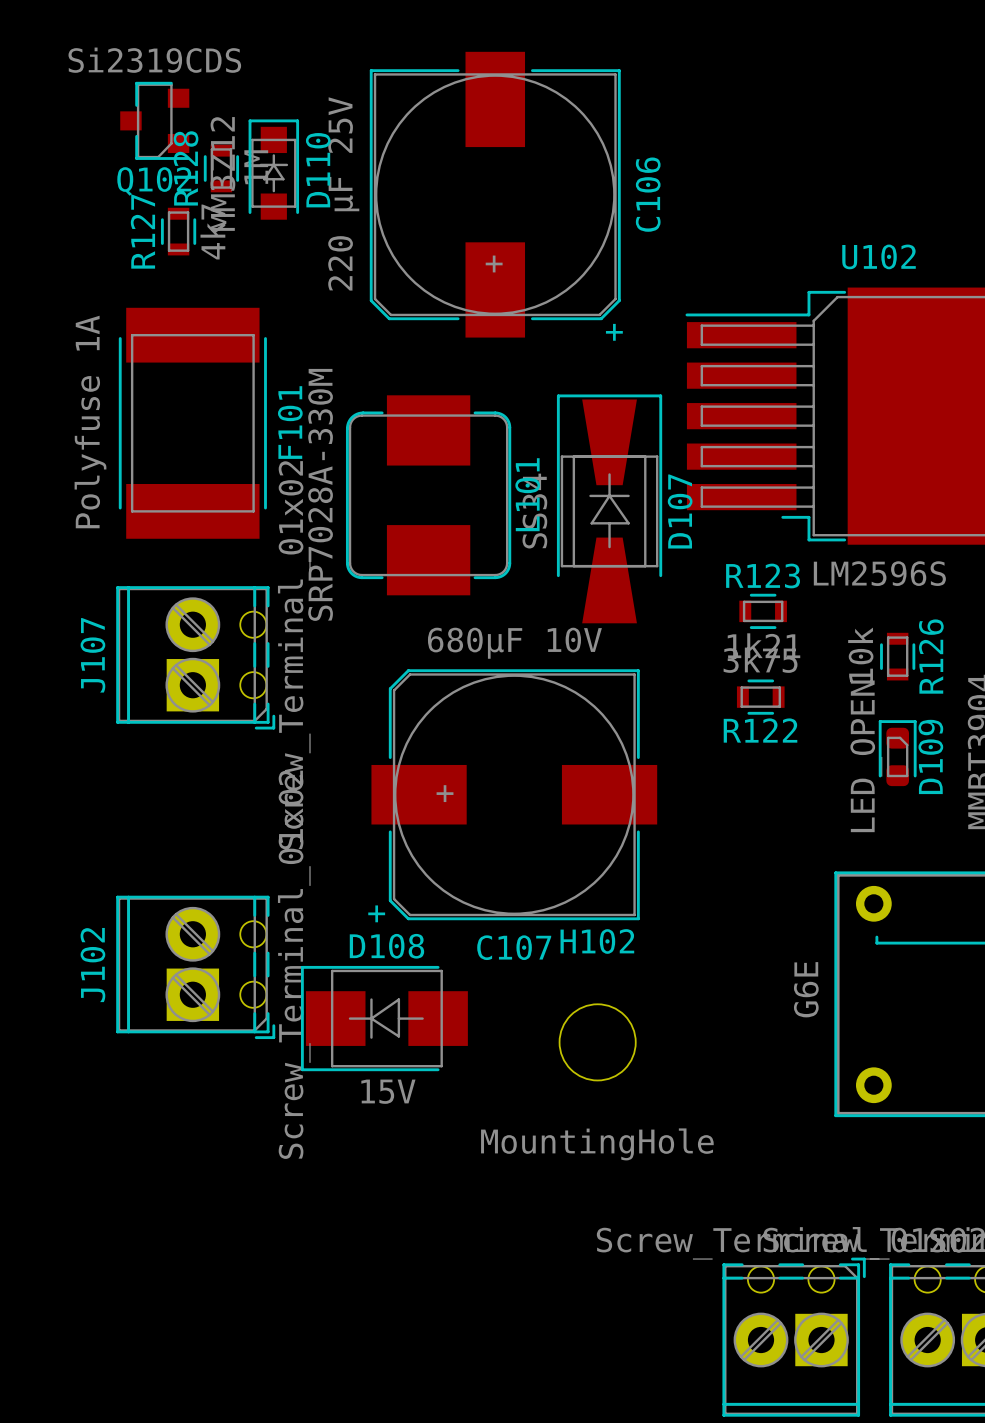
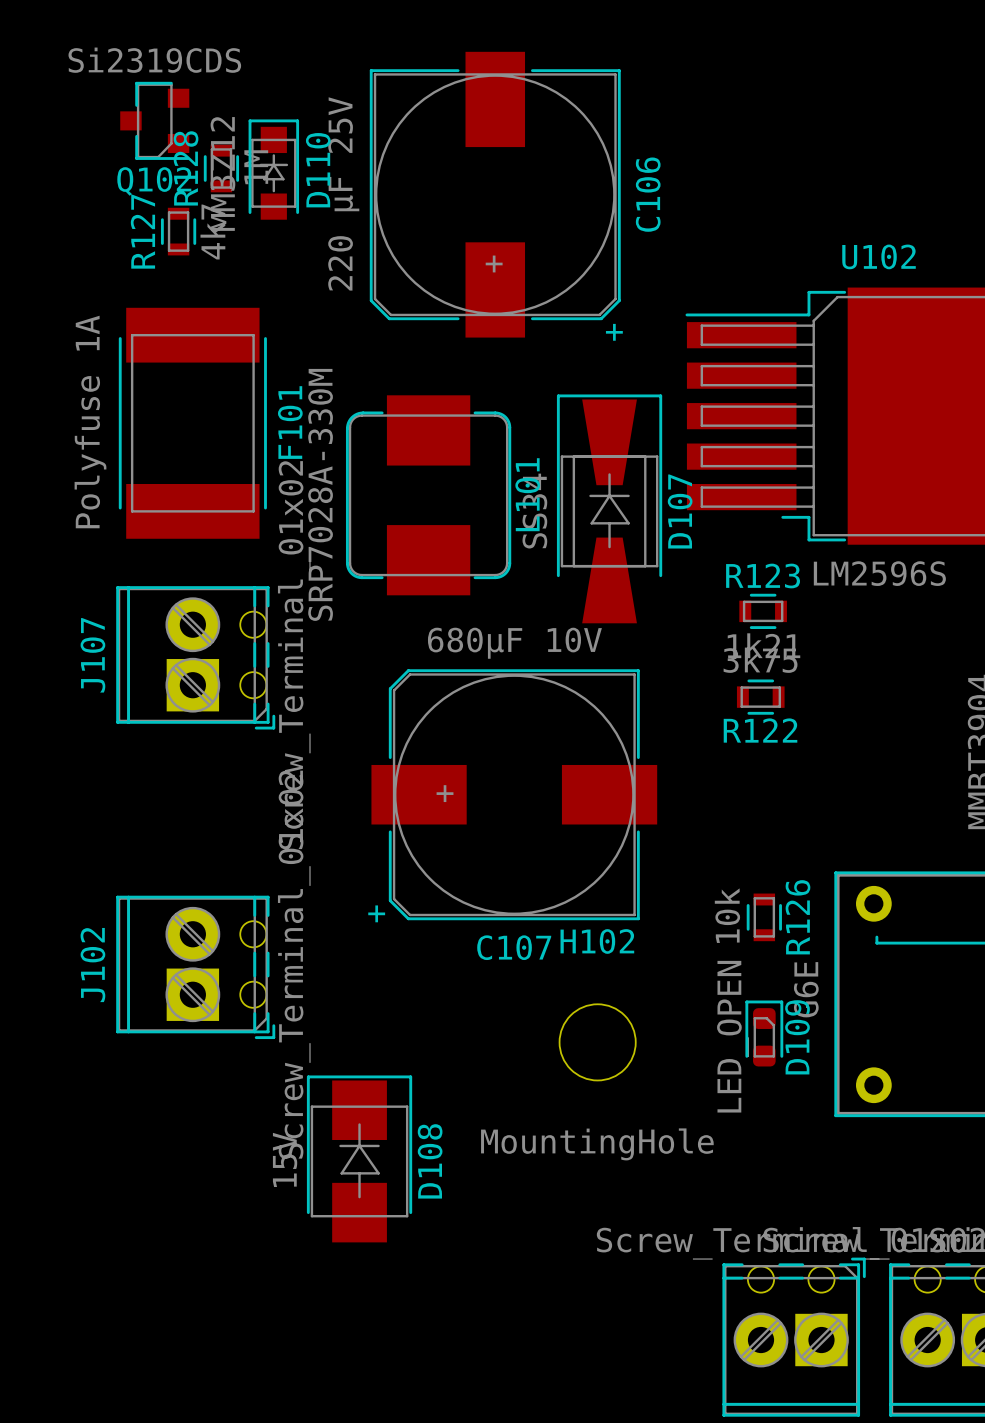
R126 position: (897, 656) -> (764, 917)
D109 position: (897, 753) -> (764, 1033)
D108 rotation: 0° (384, 1018) -> 90° clockwise (359, 1158)
D108 position: (384, 1018) -> (359, 1158)

